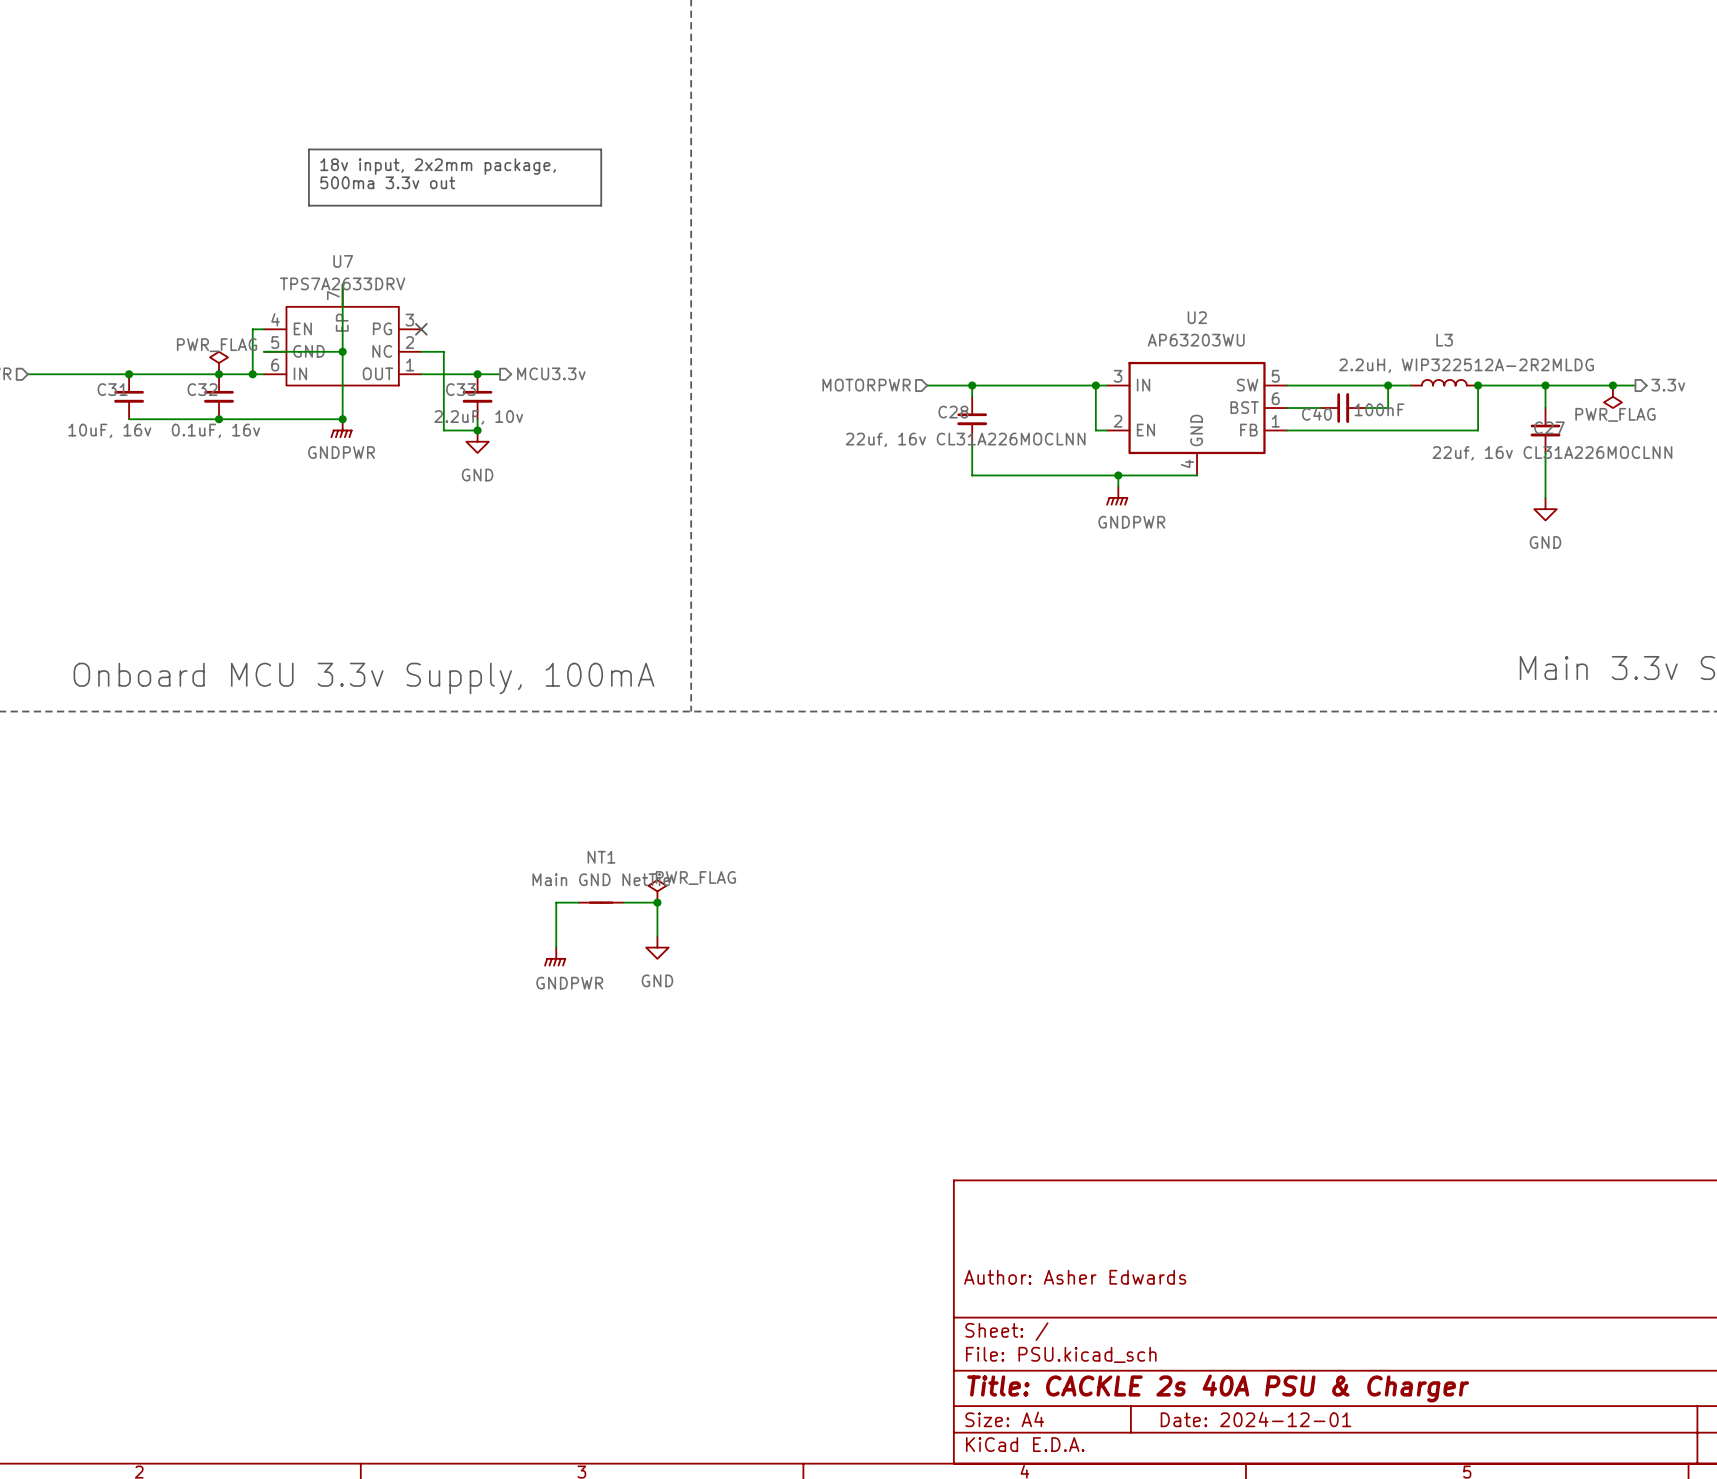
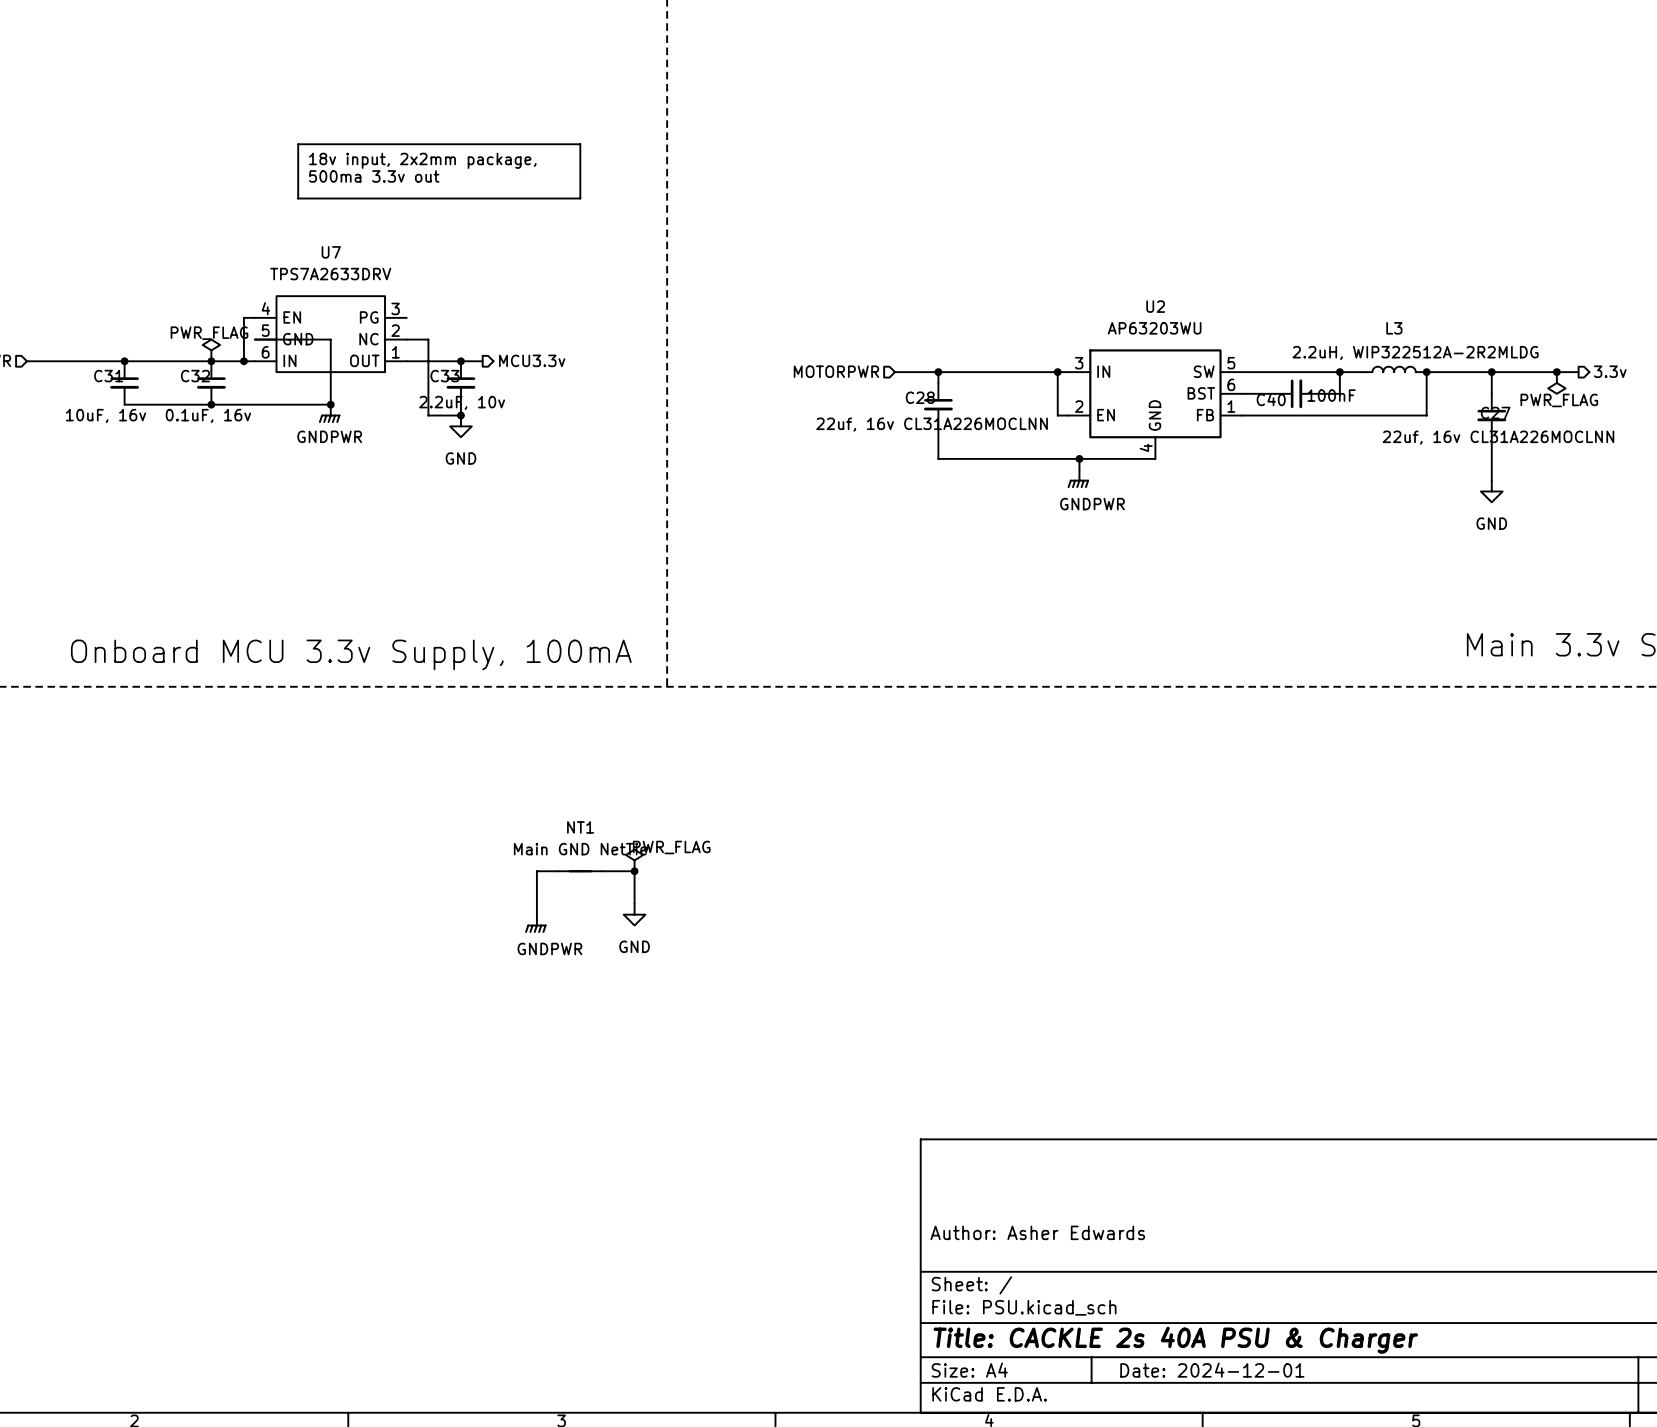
U7 symbol: [263, 284, 422, 386] -> [254, 296, 407, 373]
wire: (342, 284) (342, 351) -> none
no-connect mark: (421, 329) -> none
junction: (342, 351) -> none

